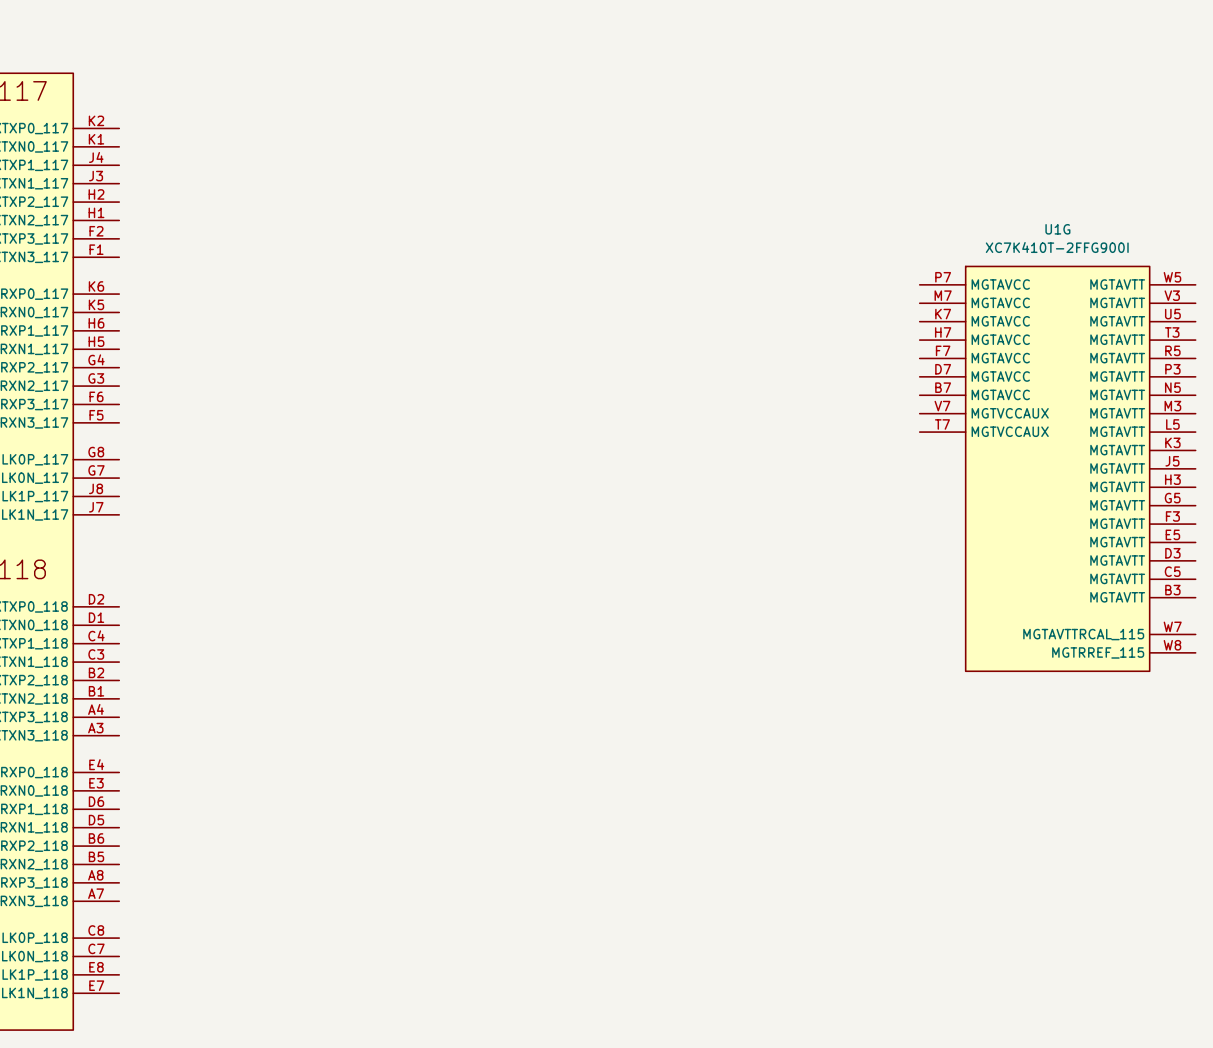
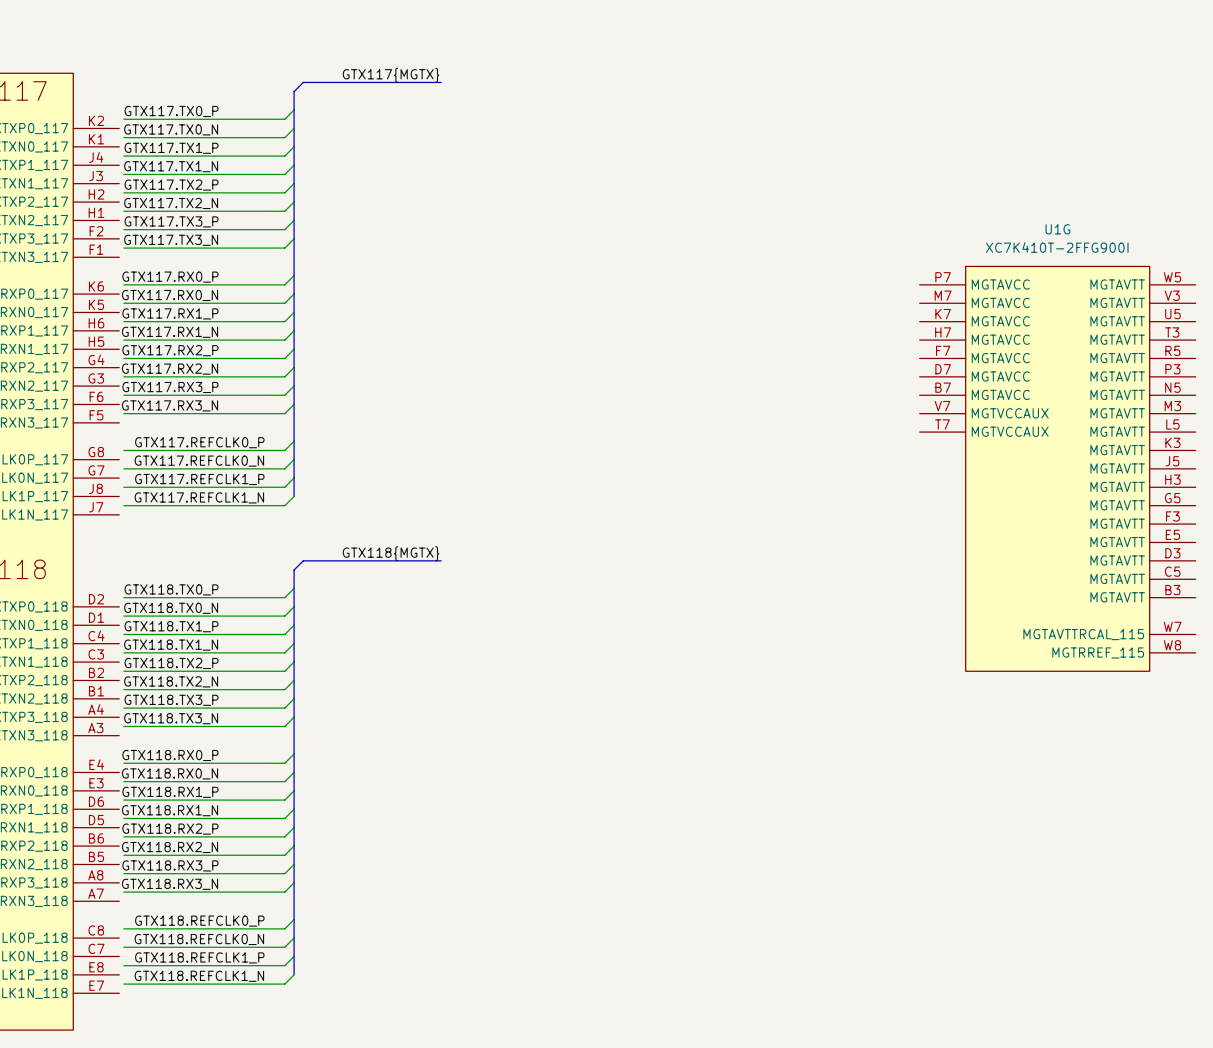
label: none -> GTX117{MGTX} (391, 75)
bus: none -> (441, 82) (303, 82) (294, 91) (294, 496)
wire: none -> (294, 110) (284, 119) (123, 119)
label: none -> GTX117.TX0_P (171, 111)
wire: none -> (294, 128) (284, 137) (123, 137)
label: none -> GTX117.TX0_N (171, 129)
wire: none -> (294, 146) (284, 156) (123, 156)
label: none -> GTX117.TX1_P (171, 148)
wire: none -> (294, 165) (284, 174) (123, 174)
label: none -> GTX117.TX1_N (171, 166)
wire: none -> (294, 183) (284, 192) (123, 192)
label: none -> GTX117.TX2_P (171, 185)
wire: none -> (294, 202) (284, 211) (123, 211)
label: none -> GTX117.TX2_N (171, 203)
wire: none -> (294, 220) (284, 229) (123, 229)
label: none -> GTX117.TX3_P (171, 221)
wire: none -> (294, 238) (284, 248) (123, 248)
label: none -> GTX117.TX3_N (171, 240)
wire: none -> (294, 275) (284, 284) (123, 284)
label: none -> GTX117.RX0_P (170, 277)
wire: none -> (294, 294) (284, 303) (123, 303)
label: none -> GTX117.RX0_N (170, 295)
wire: none -> (294, 312) (284, 321) (123, 321)
label: none -> GTX117.RX1_P (170, 313)
wire: none -> (294, 330) (284, 340) (123, 340)
label: none -> GTX117.RX1_N (170, 332)
wire: none -> (294, 349) (284, 358) (123, 358)
label: none -> GTX117.RX2_P (170, 350)
wire: none -> (294, 367) (284, 376) (123, 376)
label: none -> GTX117.RX2_N (170, 369)
wire: none -> (294, 386) (284, 395) (123, 395)
label: none -> GTX117.RX3_P (170, 387)
wire: none -> (294, 404) (284, 413) (123, 413)
label: none -> GTX117.RX3_N (170, 405)
wire: none -> (294, 441) (284, 450) (123, 450)
label: none -> GTX117.REFCLK0_P (199, 442)
wire: none -> (294, 459) (284, 468) (123, 468)
label: none -> GTX117.REFCLK0_N (199, 461)
wire: none -> (294, 478) (284, 487) (123, 487)
label: none -> GTX117.REFCLK1_P (199, 479)
wire: none -> (294, 496) (284, 505) (123, 505)
label: none -> GTX117.REFCLK1_N (199, 497)
label: none -> GTX118{MGTX} (391, 553)
bus: none -> (441, 560) (303, 560) (294, 570) (294, 974)
wire: none -> (294, 588) (284, 597) (123, 597)
label: none -> GTX118.TX0_P (171, 589)
wire: none -> (294, 606) (284, 616) (123, 616)
label: none -> GTX118.TX0_N (171, 608)
wire: none -> (294, 625) (284, 634) (123, 634)
label: none -> GTX118.TX1_P (171, 626)
wire: none -> (294, 643) (284, 652) (123, 652)
label: none -> GTX118.TX1_N (171, 645)
wire: none -> (294, 662) (284, 671) (123, 671)
label: none -> GTX118.TX2_P (171, 663)
wire: none -> (294, 680) (284, 689) (123, 689)
label: none -> GTX118.TX2_N (171, 681)
wire: none -> (294, 698) (284, 708) (123, 708)
label: none -> GTX118.TX3_P (171, 700)
wire: none -> (294, 717) (284, 726) (123, 726)
label: none -> GTX118.TX3_N (171, 718)
wire: none -> (294, 754) (284, 763) (123, 763)
label: none -> GTX118.RX0_P (170, 755)
wire: none -> (294, 772) (284, 781) (123, 781)
label: none -> GTX118.RX0_N (170, 773)
wire: none -> (294, 790) (284, 800) (123, 800)
label: none -> GTX118.RX1_P (170, 792)
wire: none -> (294, 809) (284, 818) (123, 818)
label: none -> GTX118.RX1_N (170, 810)
wire: none -> (294, 827) (284, 836) (123, 836)
label: none -> GTX118.RX2_P (170, 829)
wire: none -> (294, 846) (284, 855) (123, 855)
label: none -> GTX118.RX2_N (170, 847)
wire: none -> (294, 864) (284, 873) (123, 873)
label: none -> GTX118.RX3_P (170, 865)
wire: none -> (294, 882) (284, 892) (123, 892)
label: none -> GTX118.RX3_N (170, 884)
wire: none -> (294, 919) (284, 928) (123, 928)
label: none -> GTX118.REFCLK0_P (199, 921)
wire: none -> (294, 938) (284, 947) (123, 947)
label: none -> GTX118.REFCLK0_N (199, 939)
wire: none -> (294, 956) (284, 965) (123, 965)
label: none -> GTX118.REFCLK1_P (199, 957)
wire: none -> (294, 974) (284, 984) (123, 984)
label: none -> GTX118.REFCLK1_N (199, 976)

